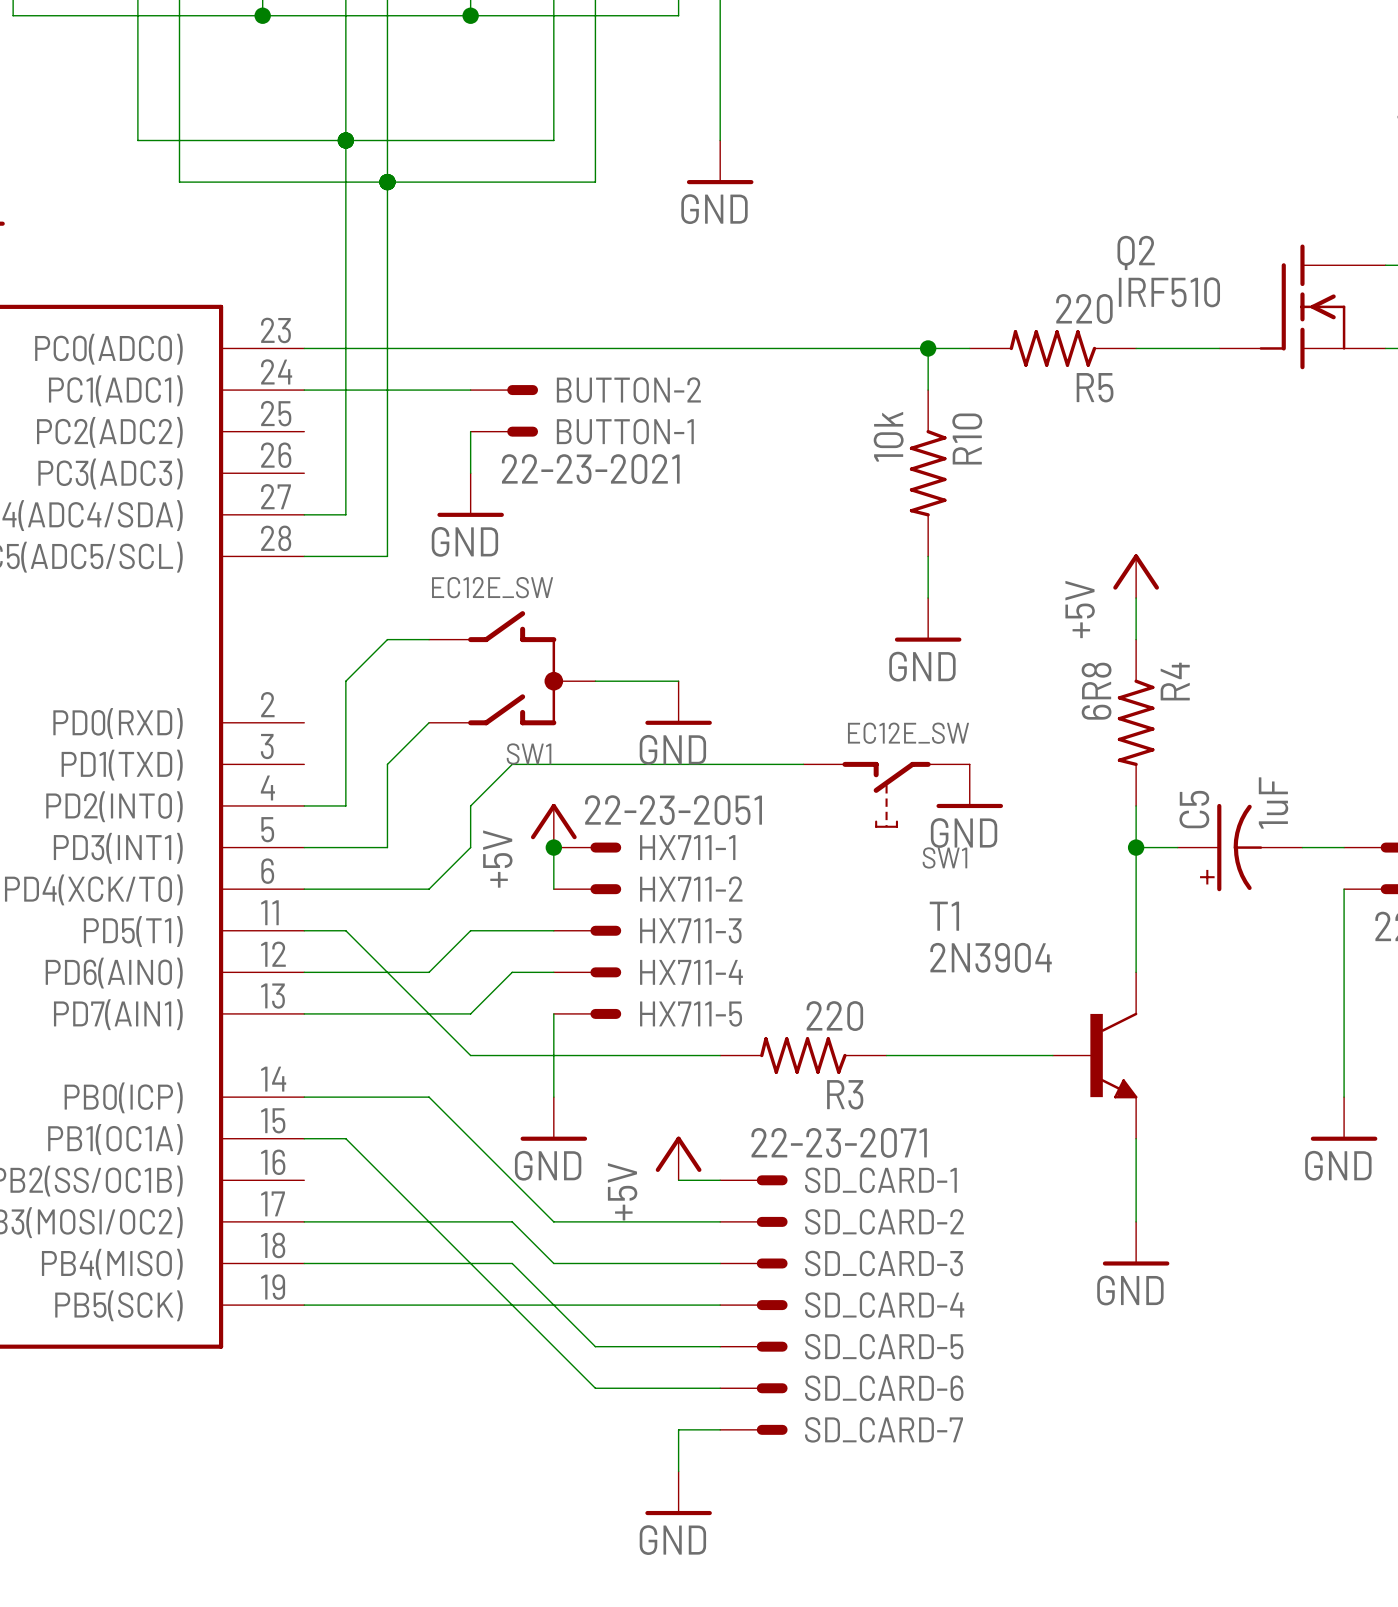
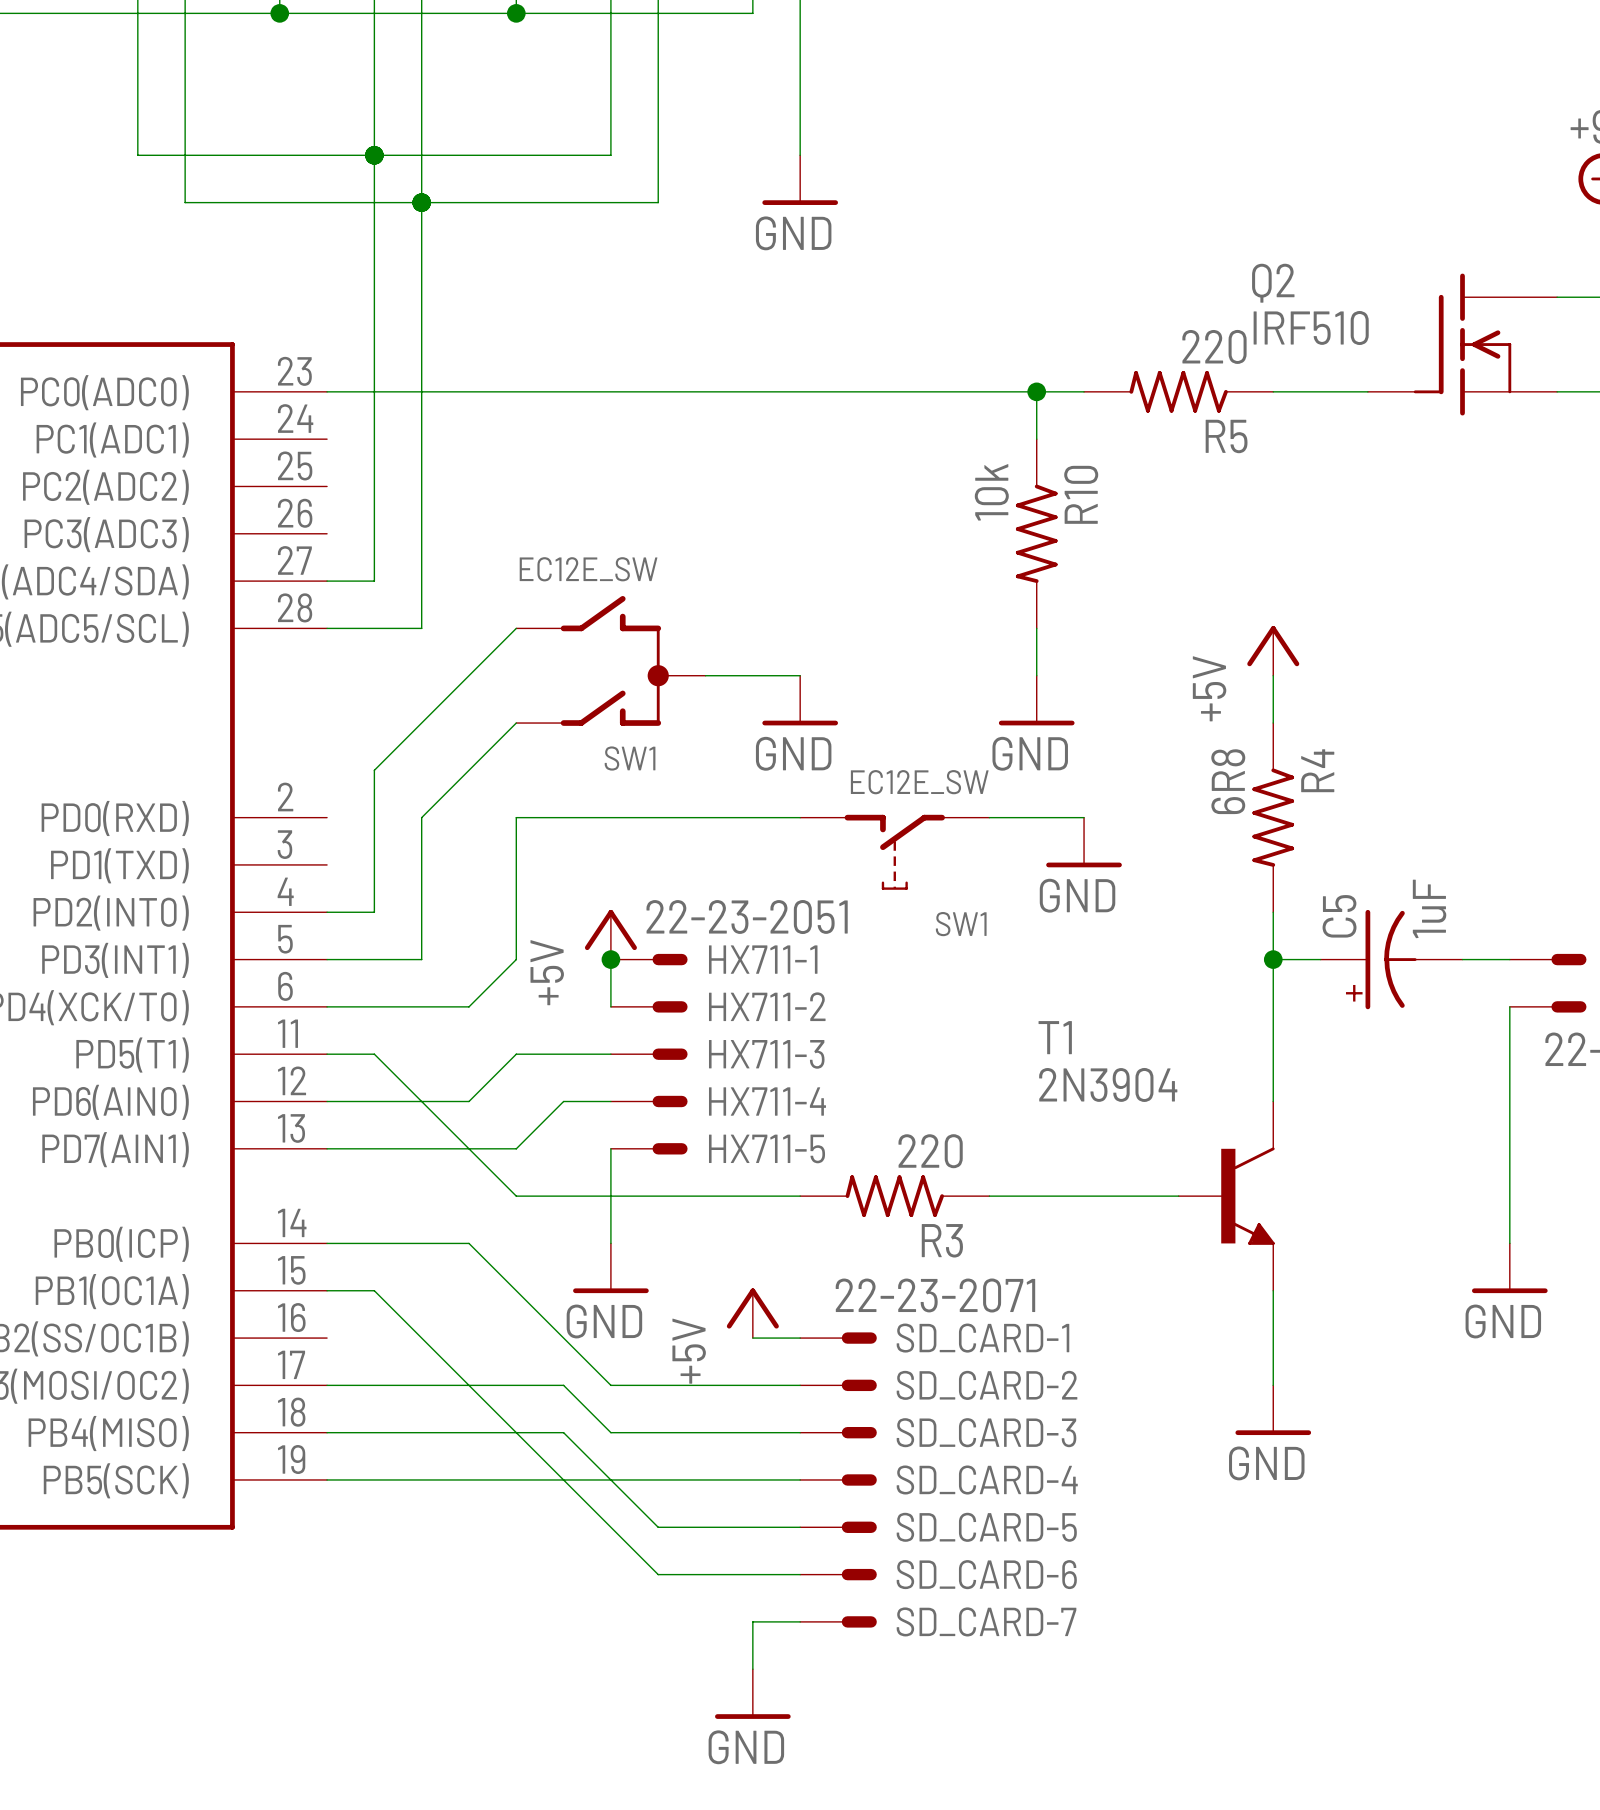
wire: (304, 390) (470, 390) -> none
BUTTON-2: (504, 390) -> none
wire: (470, 431) (470, 473) -> none
BUTTON-1: 22-23-2021 (504, 431) -> none
power symbol: GND (470, 495) -> none
wire: (387, 639) (429, 639) -> (421, 723) (516, 628)
SW1 position: (512, 668) -> (610, 660)
wire: (595, 681) (678, 681) -> (705, 675) (800, 675)
power symbol position: GND (678, 703) -> GND (800, 700)
wire: (429, 722) (387, 764) -> (516, 723) (421, 817) (421, 864)
wire: none -> (989, 817) (1084, 817)
wire: (803, 764) (512, 764) (470, 805) -> (800, 817) (516, 817) (516, 912)
power symbol position: GND (969, 786) -> GND (1084, 842)
SW1 position: (886, 794) -> (894, 852)

